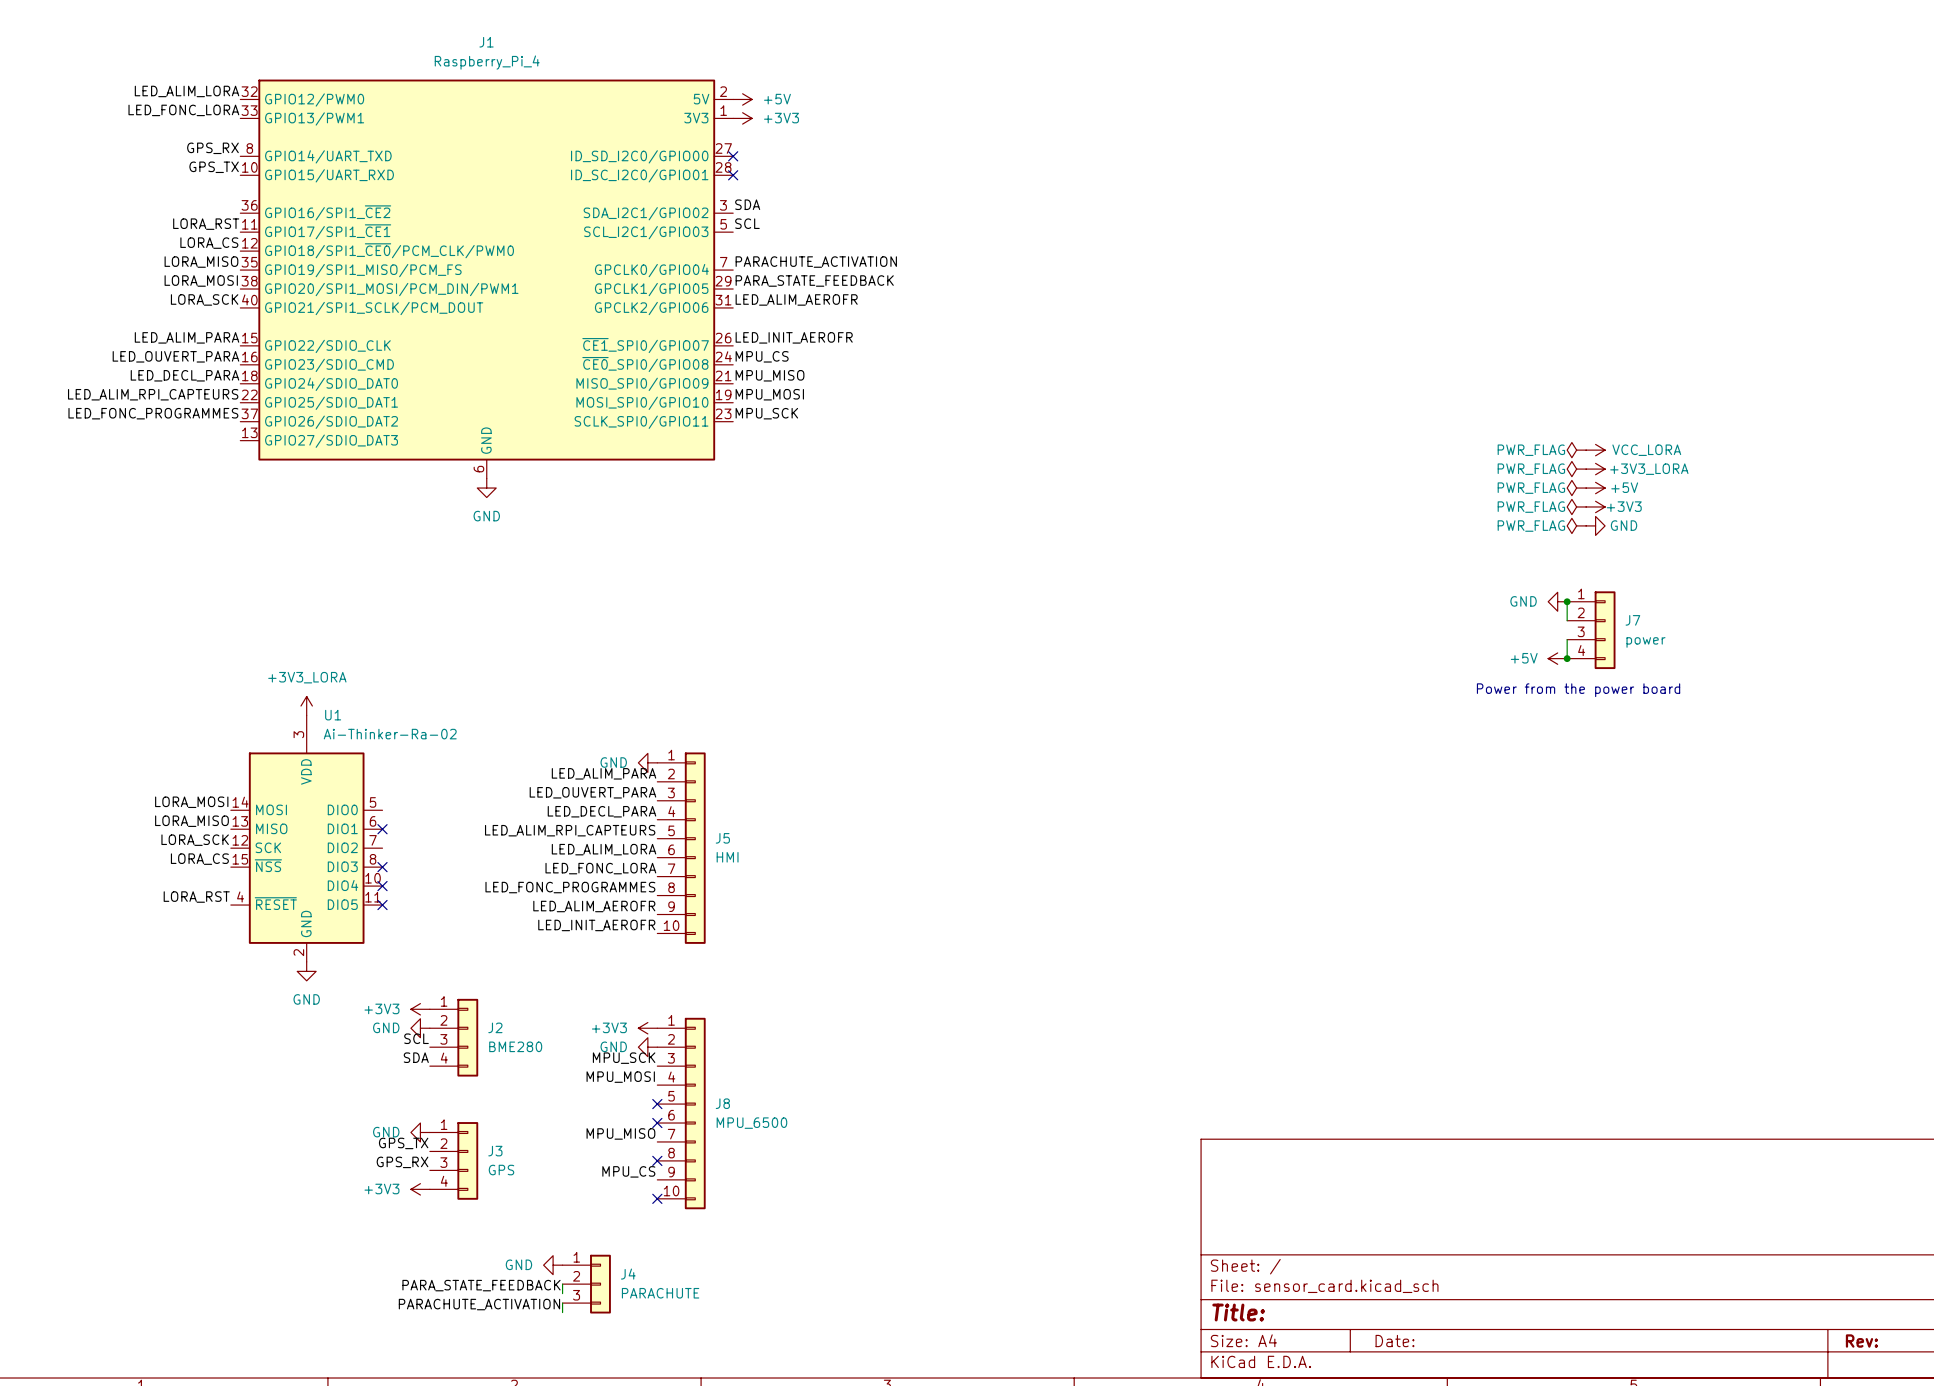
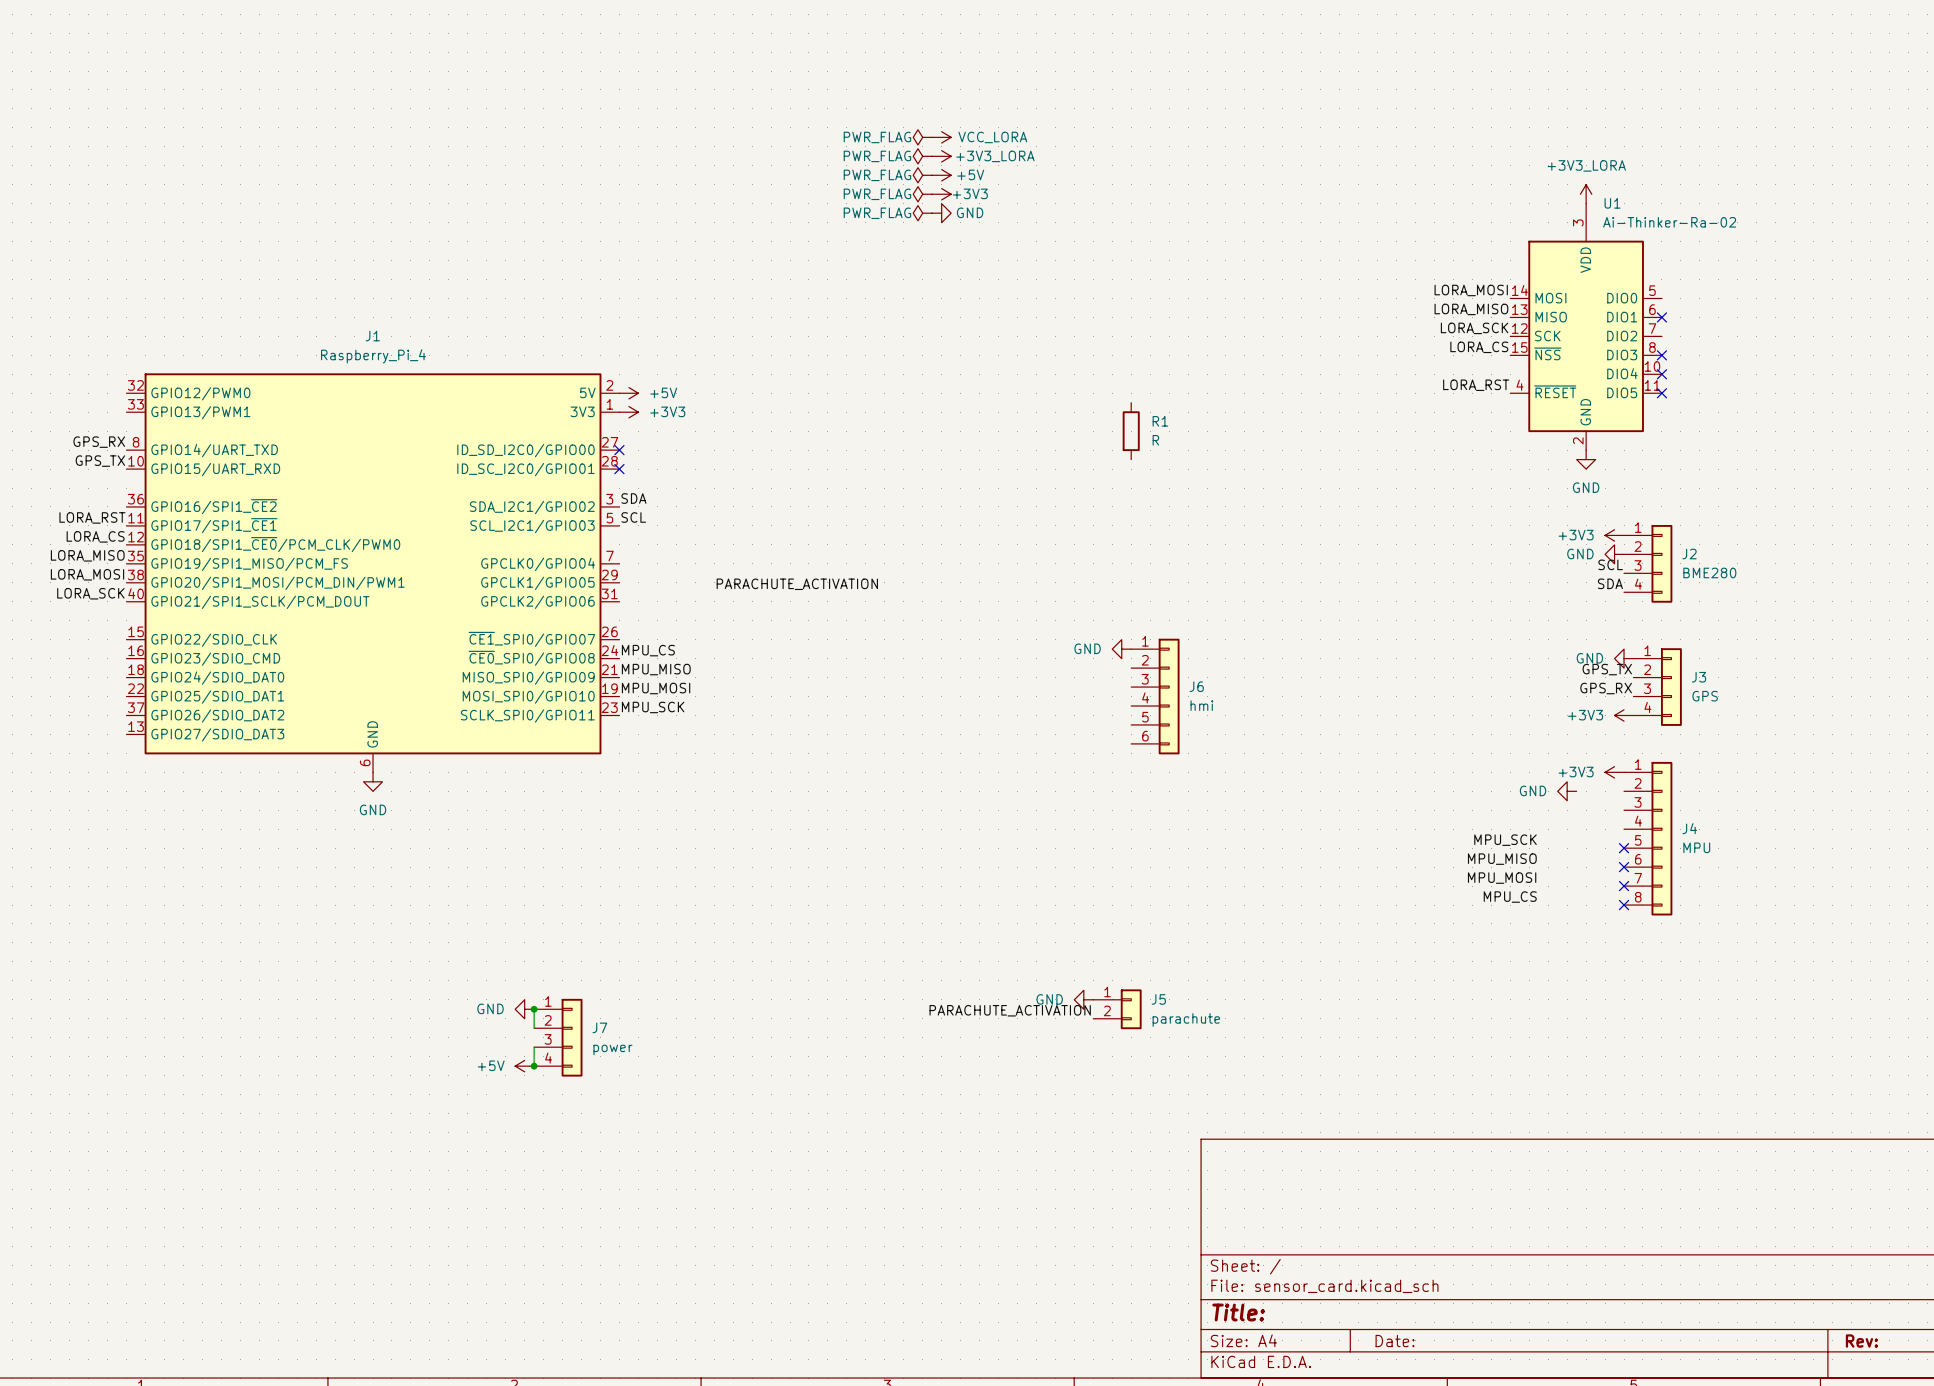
label: LED_ALIM_LORA (187, 91) -> none
power symbol: +5V (742, 99) -> none
label: LED_FONC_LORA (183, 110) -> none
power symbol: +3V3 (742, 118) -> none
power symbol: none -> PWR_FLAG (922, 137)
power symbol: none -> VCC_LORA (941, 137)
label: GPS_RX (212, 148) -> none
no-connect mark: (733, 156) -> none
power symbol: none -> PWR_FLAG (922, 156)
power symbol: none -> +3V3_LORA (941, 156)
label: GPS_TX (214, 167) -> none
no-connect mark: (733, 175) -> none
power symbol: none -> PWR_FLAG (922, 175)
power symbol: none -> +5V (941, 175)
power symbol: none -> PWR_FLAG (922, 194)
power symbol: none -> +3V3 (941, 194)
power symbol: none -> +3V3_LORA (1586, 194)
label: SDA (747, 204) -> none
power symbol: none -> PWR_FLAG (922, 213)
power symbol: none -> GND (941, 213)
label: SCL (747, 223) -> none
label: LORA_RST (206, 224) -> none
label: LORA_CS (209, 243) -> none
label: LORA_MISO (201, 262) -> none
label: PARACHUTE_ACTIVATION (816, 262) -> none
J1 position: (486, 279) -> (373, 572)
label: LORA_MOSI (201, 281) -> none
label: PARA_STATE_FEEDBACK (814, 281) -> none
label: none -> LORA_MOSI (1471, 290)
label: LORA_SCK (204, 299) -> none
label: LED_ALIM_AEROFR (796, 299) -> none
label: none -> LORA_MISO (1471, 309)
no-connect mark: none -> (1661, 317)
label: none -> LORA_SCK (1474, 328)
label: LED_ALIM_PARA (187, 337) -> none
label: LED_INIT_AEROFR (794, 337) -> none
label: none -> LORA_CS (1479, 347)
no-connect mark: none -> (1661, 355)
label: LED_OUVERT_PARA (175, 356) -> none
label: MPU_CS (762, 356) -> none
no-connect mark: none -> (1661, 374)
label: LED_DECL_PARA (184, 375) -> none
label: MPU_MISO (770, 375) -> none
label: none -> LORA_RST (1476, 385)
power symbol: none -> +5V (628, 393)
no-connect mark: none -> (1661, 393)
label: LED_ALIM_RPI_CAPTEURS (153, 394) -> none
label: MPU_MOSI (769, 394) -> none
power symbol: none -> +3V3 (628, 412)
label: LED_FONC_PROGRAMMES (153, 413) -> none
label: MPU_SCK (766, 413) -> none
R1: none -> R (1131, 431)
label: none -> GPS_RX (99, 442)
no-connect mark: none -> (619, 450)
power symbol: PWR_FLAG (1576, 450) -> none
power symbol: VCC_LORA (1595, 450) -> none
power symbol: none -> GND (1586, 459)
label: none -> GPS_TX (100, 461)
no-connect mark: none -> (619, 469)
power symbol: PWR_FLAG (1576, 469) -> none
power symbol: +3V3_LORA (1595, 469) -> none
power symbol: GND (486, 488) -> none
power symbol: PWR_FLAG (1576, 488) -> none
power symbol: +5V (1595, 488) -> none
label: none -> SDA (633, 498)
power symbol: PWR_FLAG (1576, 506) -> none
power symbol rotation: 0° (1595, 506) -> 180° (1614, 535)
power symbol position: +3V3 (1595, 506) -> +3V3 (1614, 535)
label: none -> LORA_RST (92, 517)
label: none -> SCL (633, 517)
power symbol: PWR_FLAG (1576, 525) -> none
power symbol: GND (1595, 525) -> none
label: none -> LORA_CS (95, 536)
power symbol: none -> GND (1614, 554)
label: none -> LORA_MISO (87, 555)
label: none -> SCL (1610, 564)
label: none -> LORA_MOSI (87, 574)
label: none -> SDA (1610, 583)
label: none -> PARACHUTE_ACTIVATION (797, 584)
label: none -> LORA_SCK (90, 593)
power symbol: GND (1557, 601) -> none
wire: (1567, 601) (1567, 620) -> none
junction: (1567, 601) -> none
J7 position: (1591, 630) -> (558, 1037)
wire: (1567, 639) (1567, 658) -> none
power symbol: none -> GND (1121, 649)
label: none -> MPU_CS (648, 650)
power symbol: +5V (1557, 658) -> none
junction: (1567, 658) -> none
power symbol: none -> GND (1624, 658)
label: none -> MPU_MISO (656, 669)
label: none -> GPS_TX (1607, 669)
label: none -> MPU_MOSI (656, 688)
label: none -> GPS_RX (1606, 688)
text: Power from the power board (1578, 690) -> none
J6: none -> hmi (1155, 696)
power symbol: +3V3_LORA (306, 706) -> none
label: none -> MPU_SCK (653, 707)
power symbol: none -> +3V3 (1624, 715)
J5 symbol: [657, 752, 706, 944] -> [1093, 989, 1142, 1030]
power symbol: GND (647, 762) -> none
power symbol: none -> +3V3 (1614, 772)
label: LED_ALIM_PARA (604, 773) -> none
power symbol: none -> GND (373, 781)
power symbol: none -> GND (1567, 791)
label: LED_OUVERT_PARA (592, 792) -> none
label: LORA_MOSI (191, 802) -> none
label: LED_DECL_PARA (601, 811) -> none
label: LORA_MISO (191, 821) -> none
no-connect mark: (382, 829) -> none
label: LED_ALIM_RPI_CAPTEURS (570, 830) -> none
U1 position: (306, 838) -> (1586, 326)
label: LORA_SCK (195, 840) -> none
label: none -> MPU_SCK (1505, 840)
no-connect mark: none -> (1624, 848)
label: LED_ALIM_LORA (604, 849) -> none
J5 value: HMI (727, 857) -> parachute (1186, 1019)
label: LORA_CS (199, 859) -> none
label: none -> MPU_MISO (1502, 859)
no-connect mark: (382, 867) -> none
no-connect mark: none -> (1624, 867)
label: LED_FONC_LORA (600, 868) -> none
label: none -> MPU_MOSI (1502, 878)
no-connect mark: (382, 886) -> none
no-connect mark: none -> (1624, 886)
label: LED_FONC_PROGRAMMES (570, 887) -> none
label: LORA_RST (196, 897) -> none
label: none -> MPU_CS (1510, 897)
no-connect mark: (382, 905) -> none
no-connect mark: none -> (1624, 905)
label: LED_ALIM_AEROFR (594, 906) -> none
label: LED_INIT_AEROFR (596, 925) -> none
power symbol: GND (306, 971) -> none
power symbol: none -> GND (1083, 999)
power symbol: +3V3 (420, 1009) -> none
power symbol: none -> GND (524, 1009)
wire: none -> (534, 1009) (534, 1028)
junction: none -> (534, 1009)
label: none -> PARACHUTE_ACTIVATION (1010, 1010)
power symbol: GND (420, 1028) -> none
power symbol: +3V3 (647, 1028) -> none
J2 position: (454, 1037) -> (1648, 563)
label: SCL (416, 1038) -> none
wire: none -> (534, 1047) (534, 1066)
power symbol: GND (647, 1047) -> none
label: SDA (416, 1057) -> none
label: MPU_SCK (624, 1058) -> none
power symbol: none -> +5V (524, 1066)
junction: none -> (534, 1066)
label: MPU_MOSI (620, 1077) -> none
no-connect mark: (657, 1104) -> none
J8: MPU_6500 (681, 1113) -> none
no-connect mark: (657, 1123) -> none
power symbol: GND (420, 1132) -> none
label: MPU_MISO (620, 1133) -> none
label: GPS_TX (403, 1143) -> none
J3 position: (454, 1160) -> (1657, 687)
no-connect mark: (657, 1160) -> none
label: GPS_RX (402, 1162) -> none
label: MPU_CS (628, 1171) -> none
power symbol: +3V3 (420, 1189) -> none
no-connect mark: (657, 1198) -> none
J4 symbol: [562, 1254, 611, 1314] -> [1624, 761, 1673, 916]
power symbol: GND (553, 1265) -> none
wire: (562, 1284) (562, 1293) -> none
label: PARA_STATE_FEEDBACK (481, 1285) -> none
J4 value: PARACHUTE (660, 1293) -> MPU (1696, 847)
wire: (562, 1303) (562, 1312) -> none
label: PARACHUTE_ACTIVATION (479, 1304) -> none

